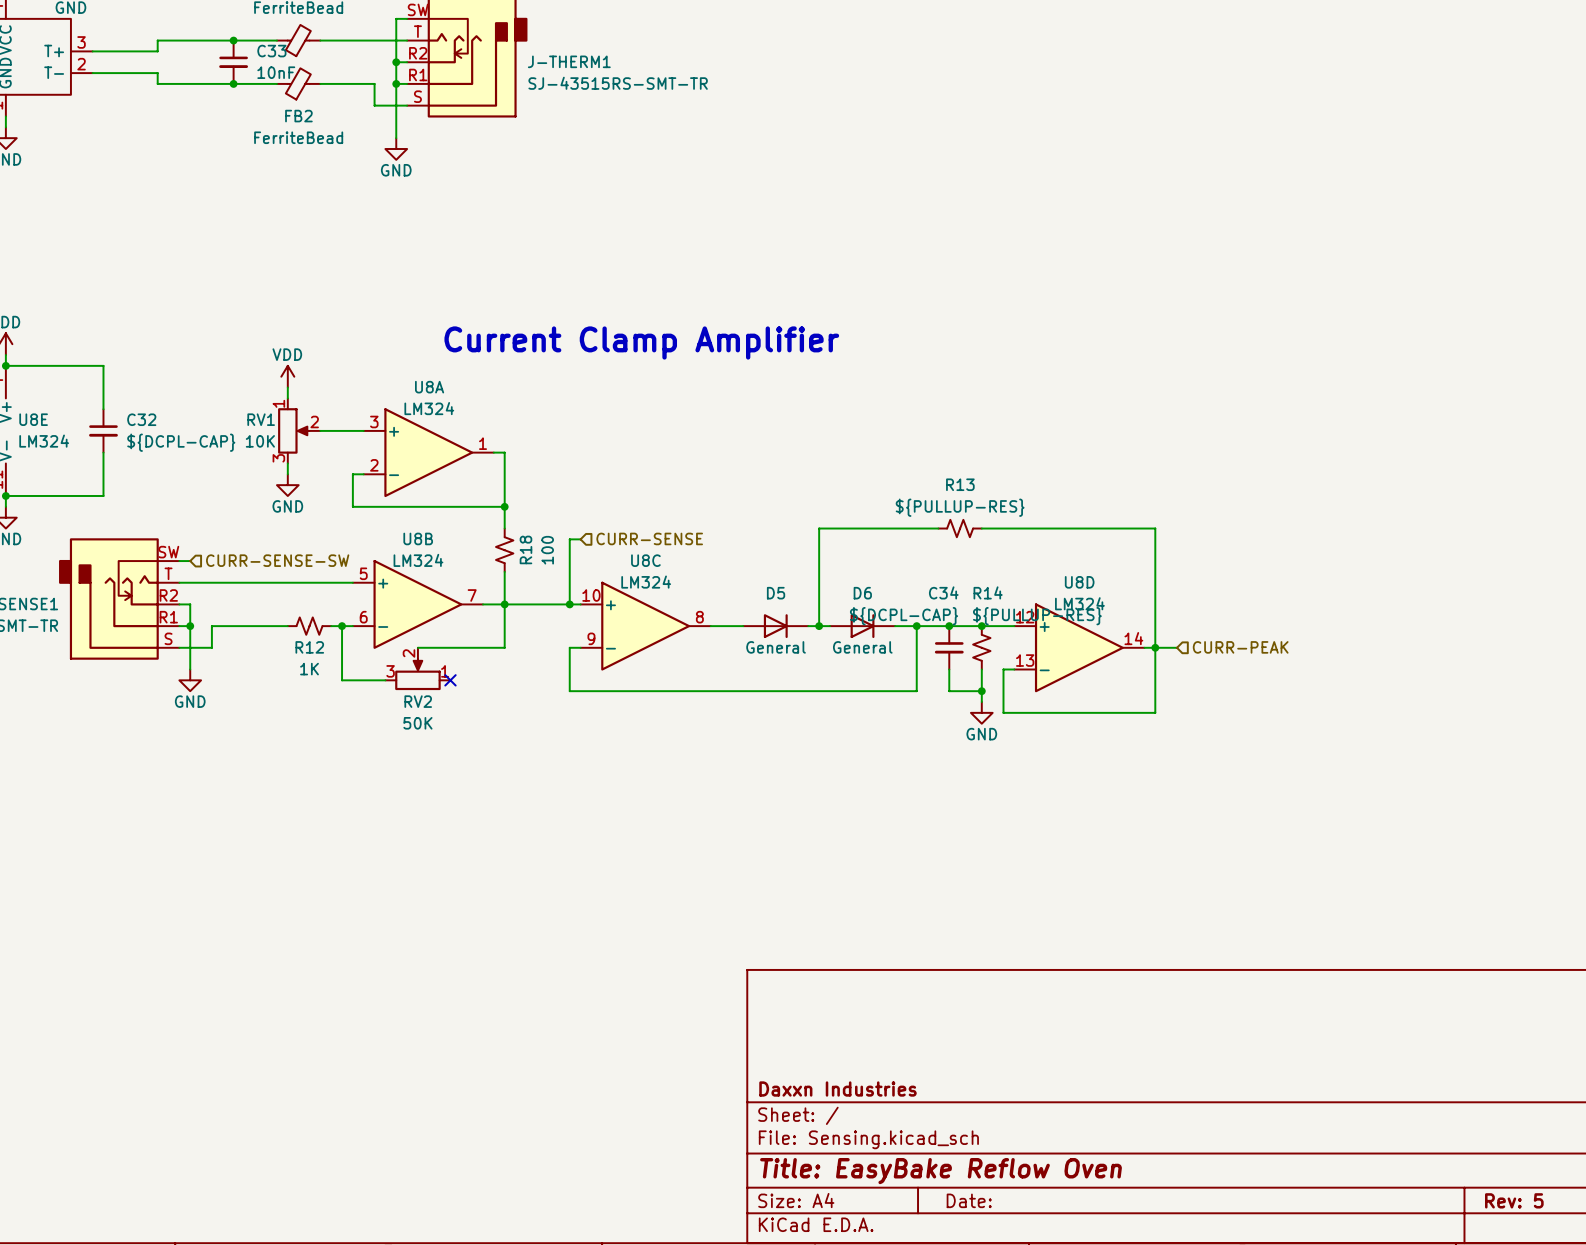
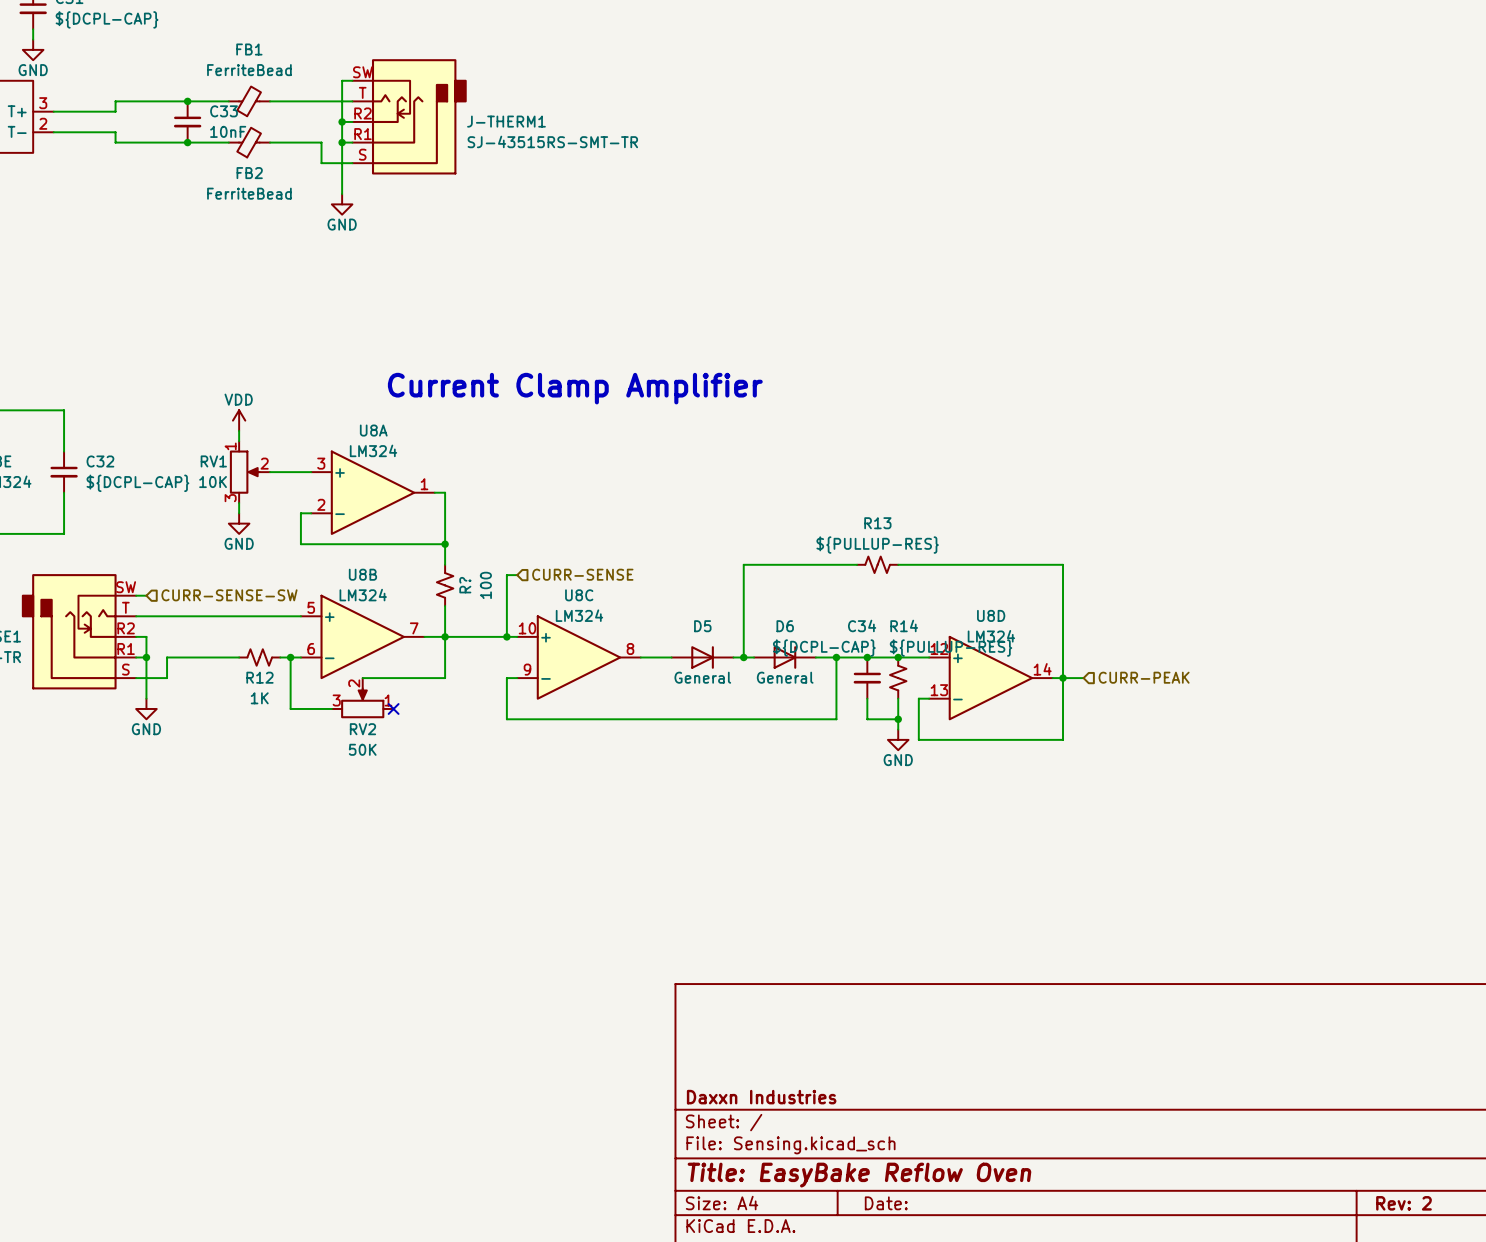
R18 name: R18 (525, 549) -> R? (465, 585)
title block: Rev: 5 (1514, 1200) -> Rev: 2 (1403, 1203)

